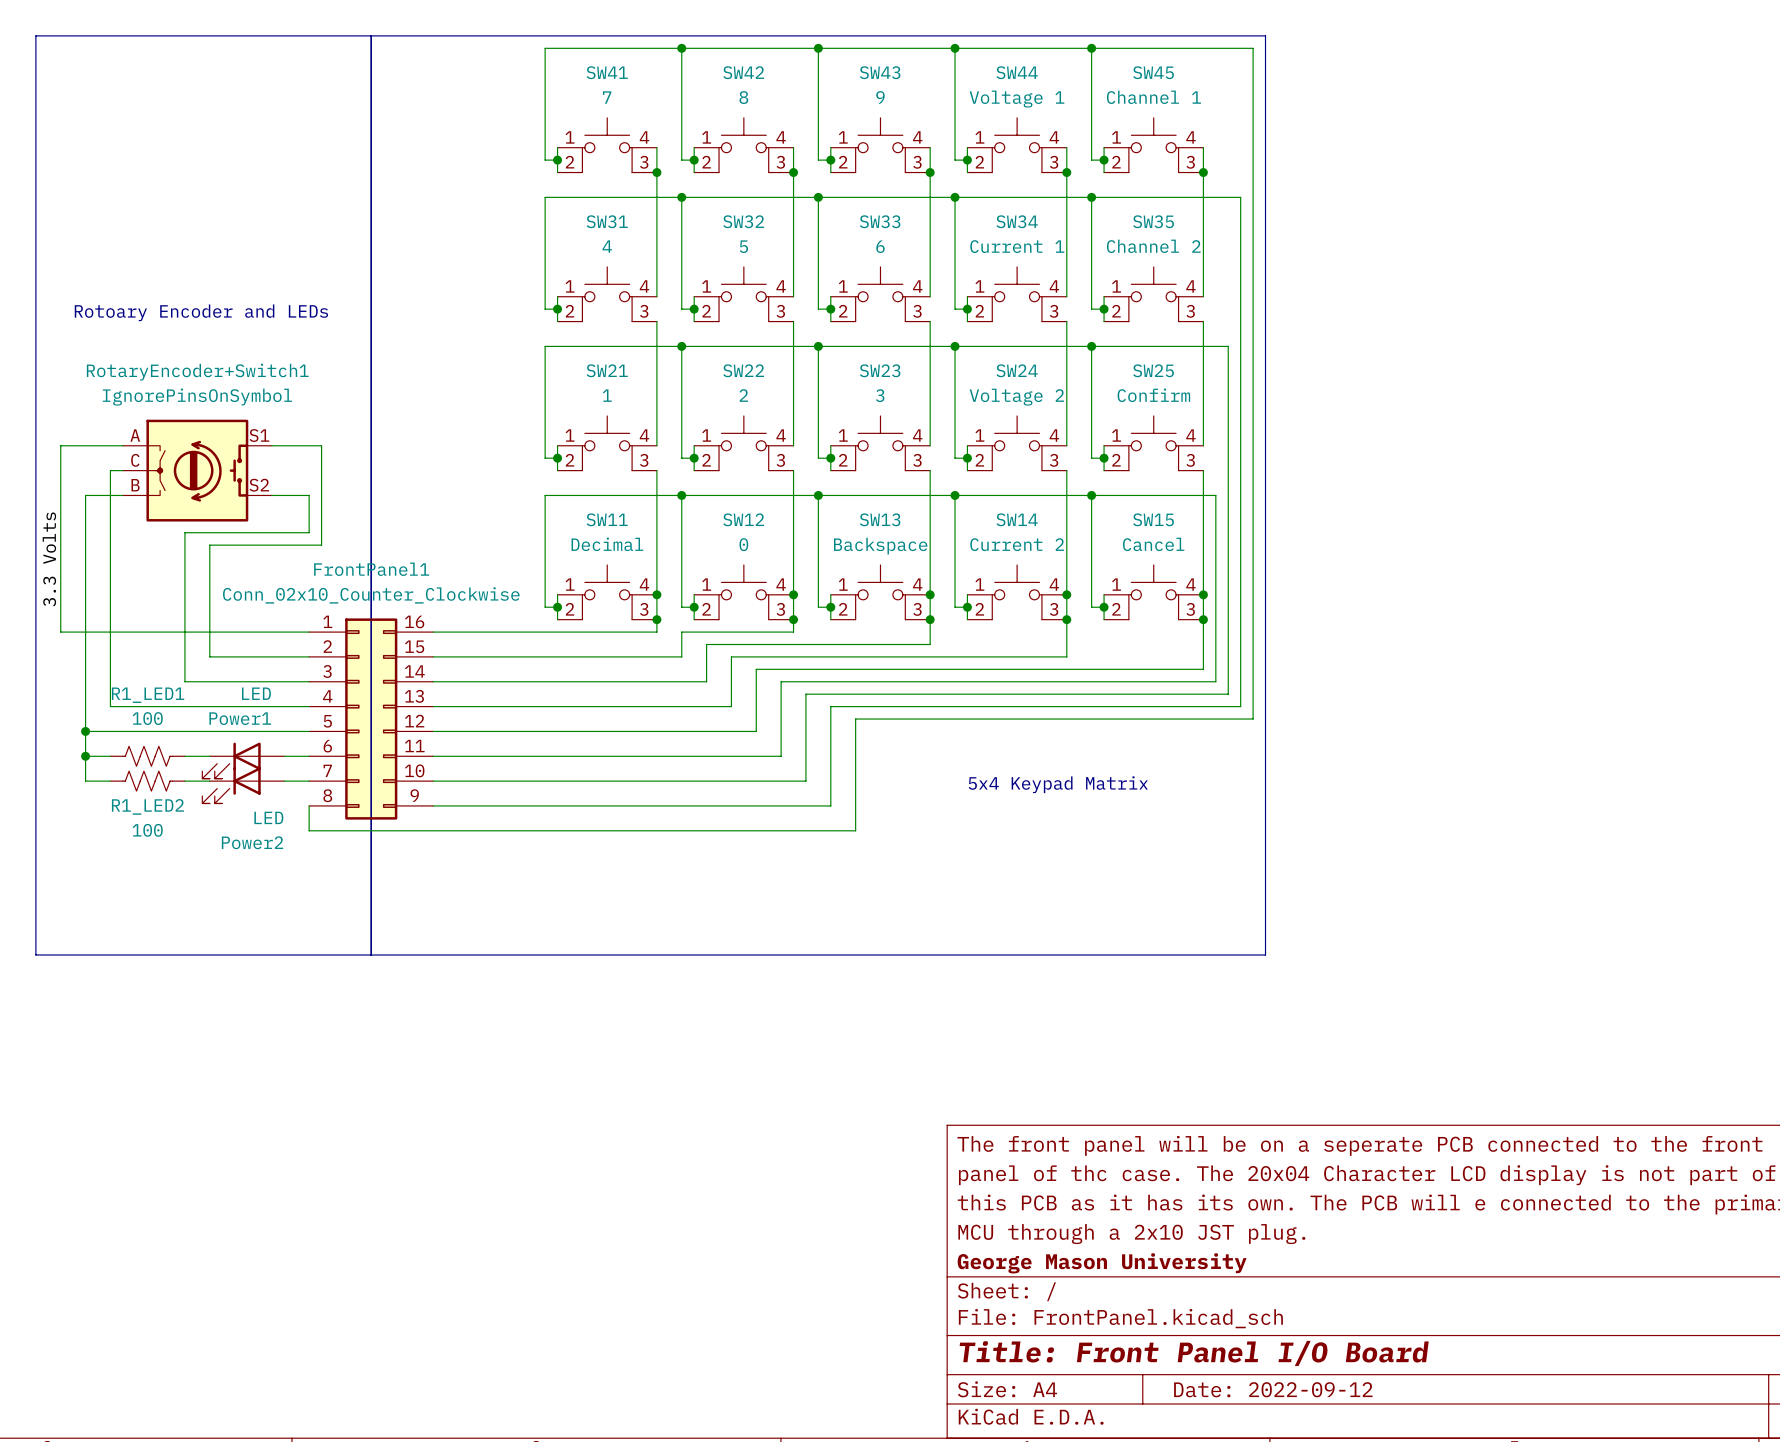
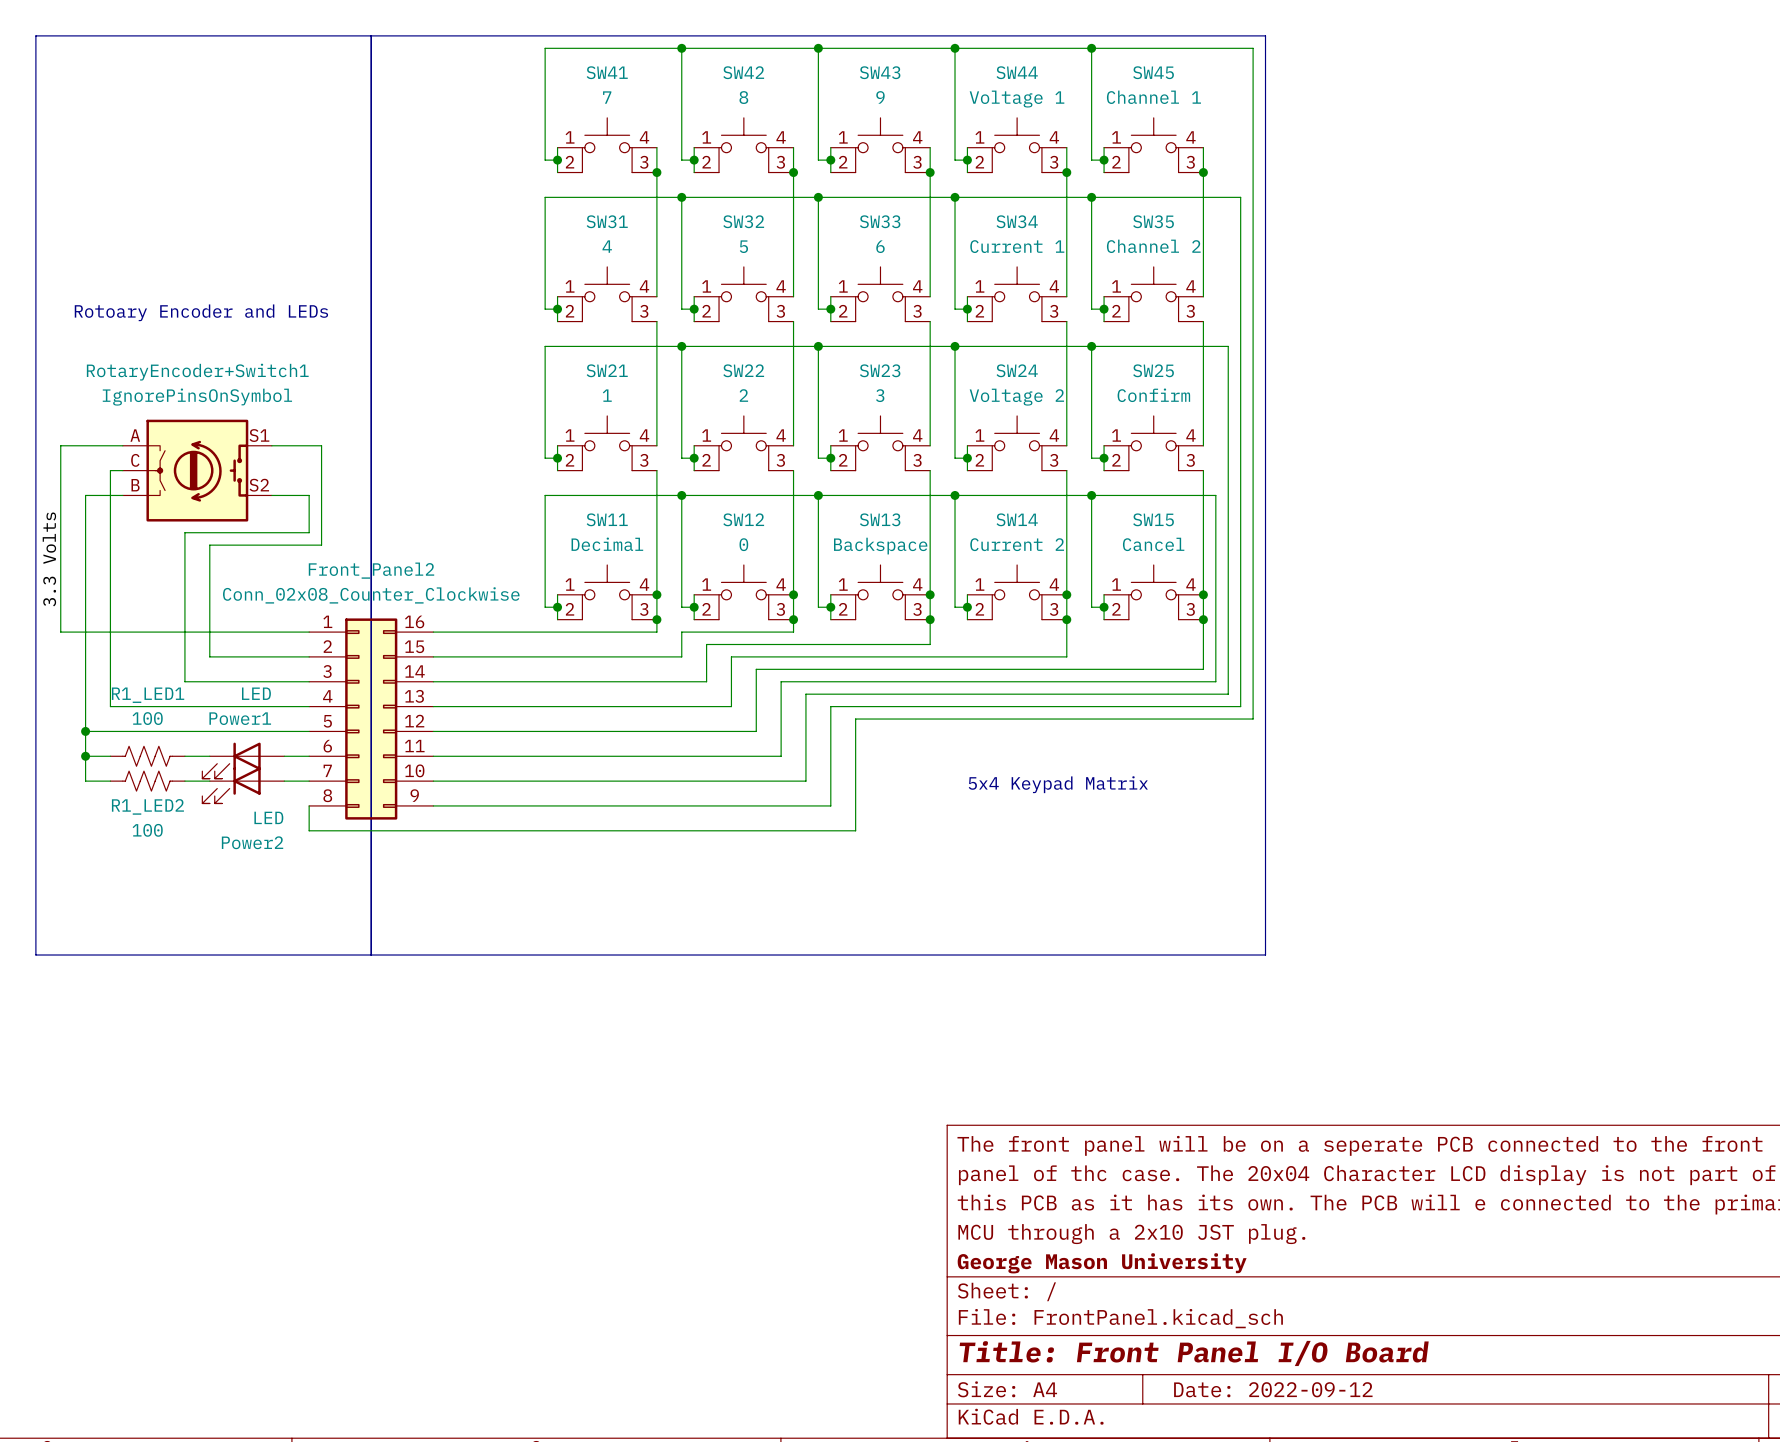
FrontPanel1 name: FrontPanel1 (371, 569) -> Front_Panel2 (371, 570)
FrontPanel1 value: Conn_02x10_Counter_Clockwise (371, 595) -> Conn_02x08_Counter_Clockwise (371, 595)

